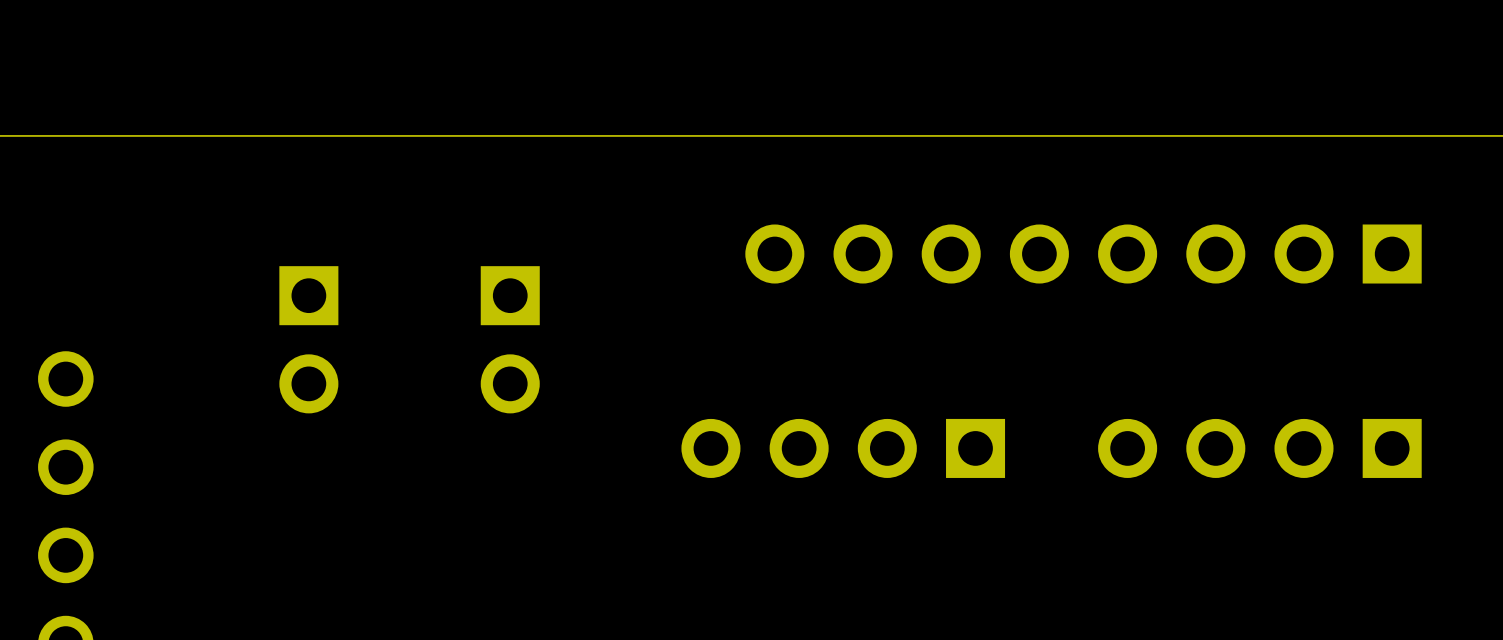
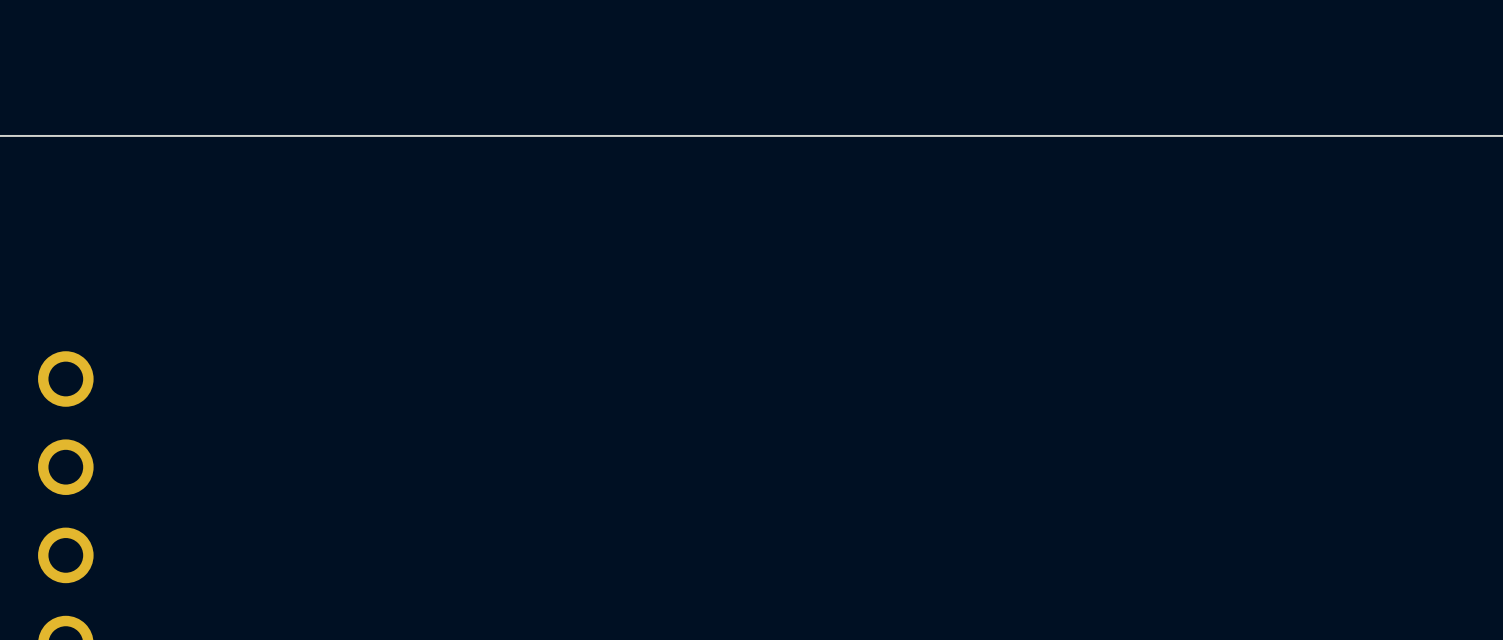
part: (1083, 254) -> none
part: (308, 339) -> none
part: (510, 339) -> none
part: (843, 448) -> none
part: (1259, 448) -> none

